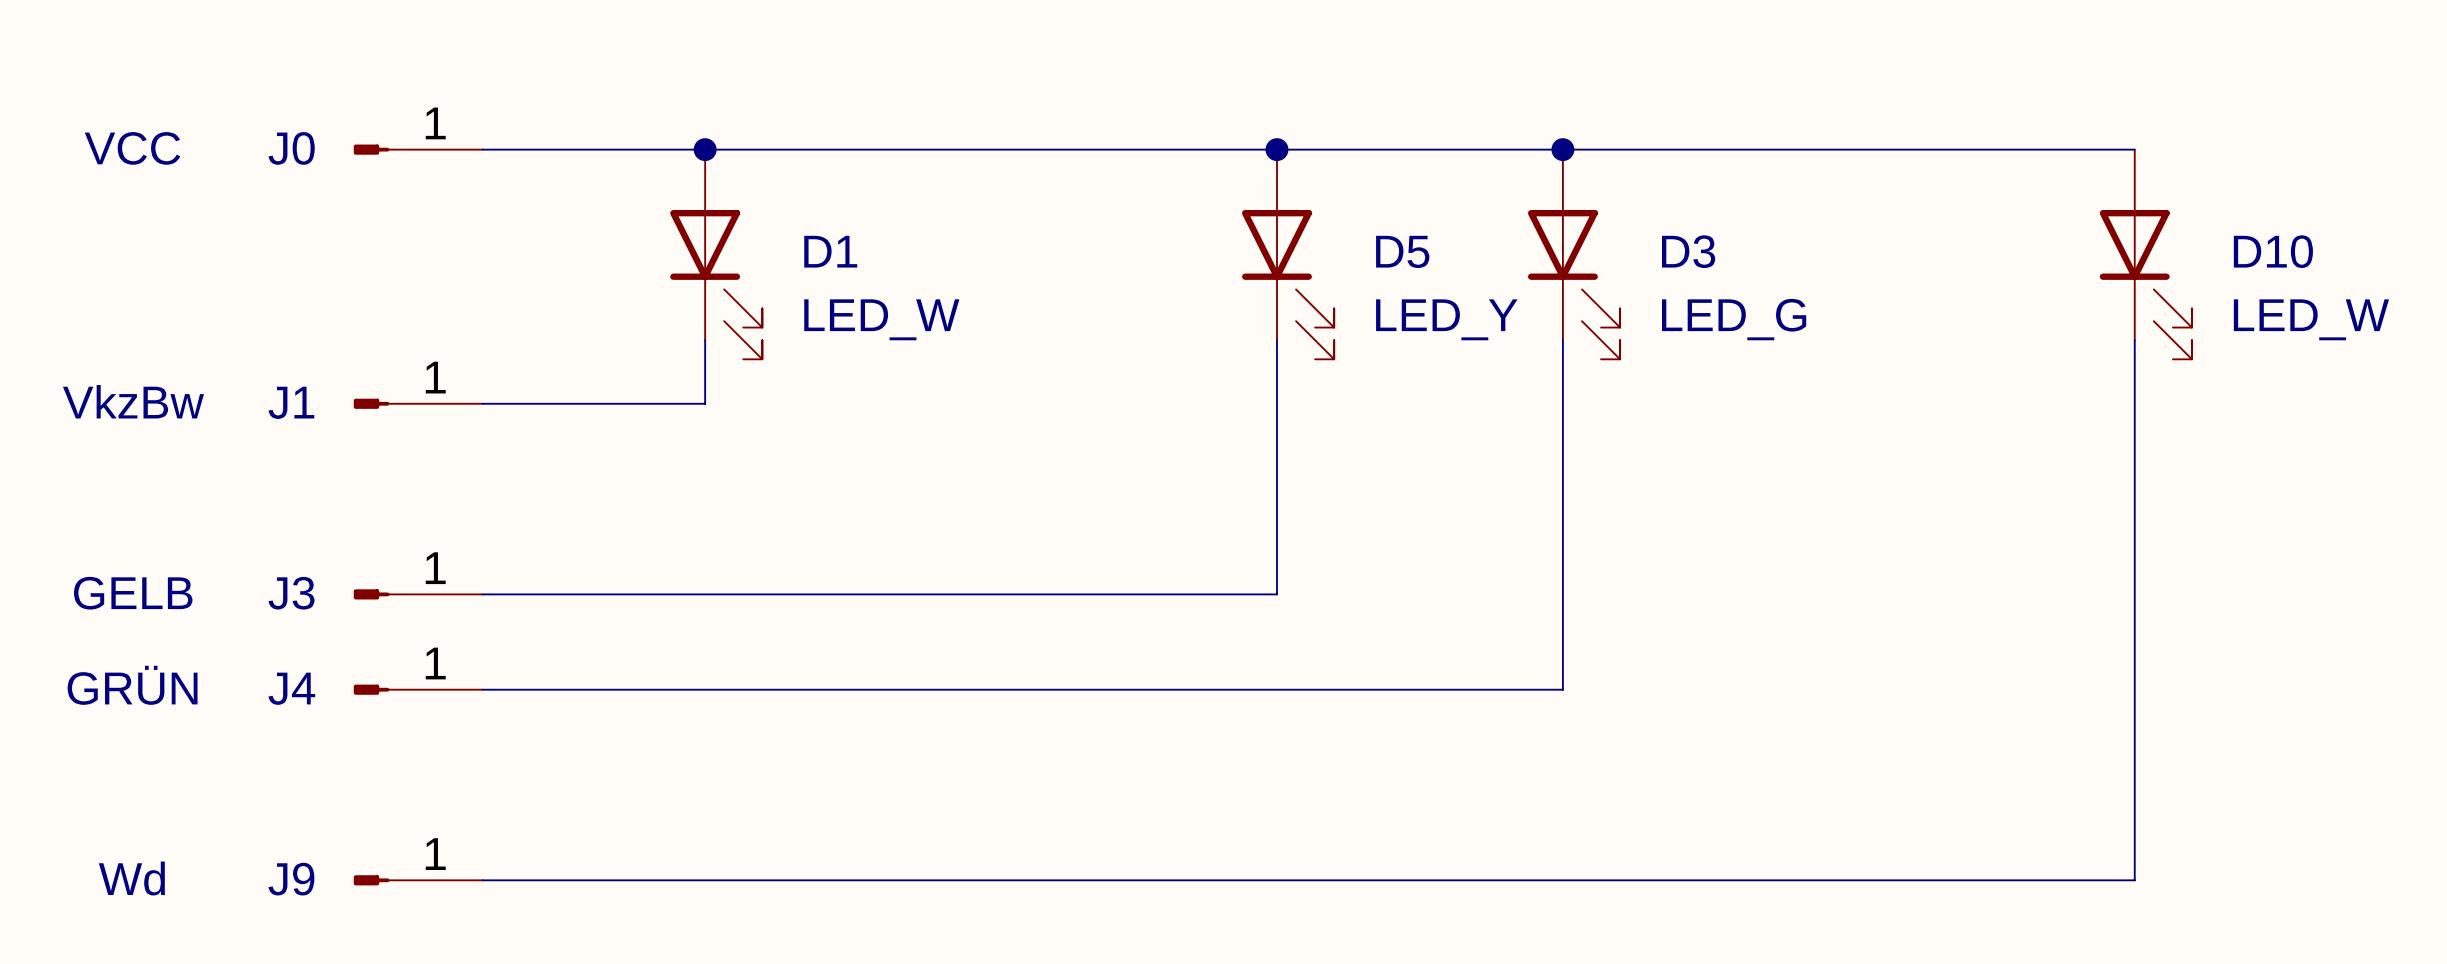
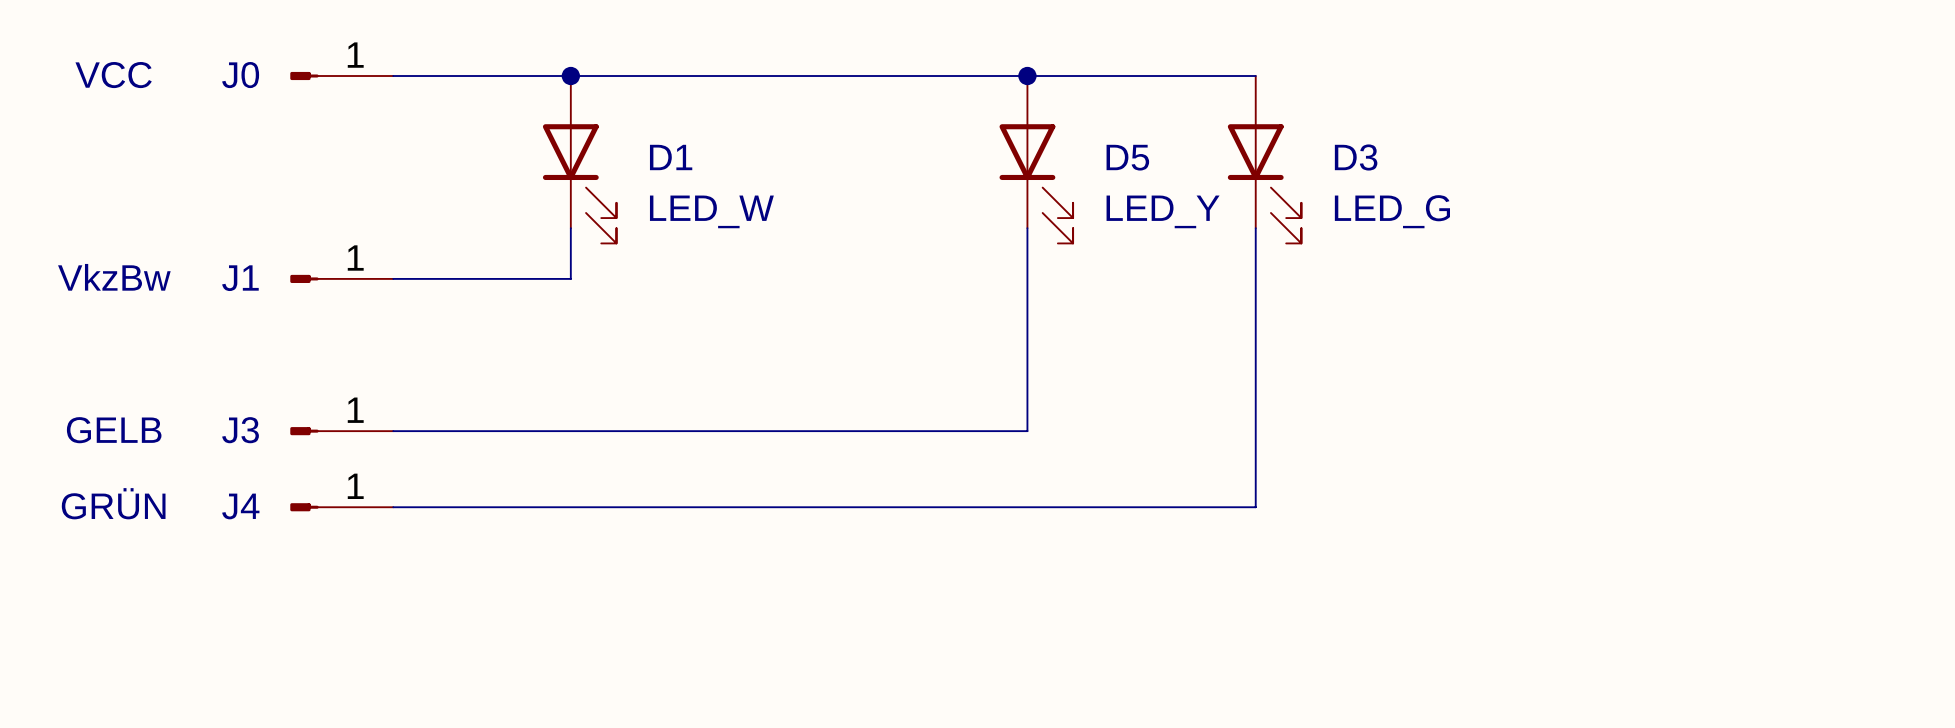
wire: (1562, 149) (2134, 149) -> none
junction: (1562, 149) -> none
D10: LED_W (2145, 254) -> none
wire: (2134, 340) (2134, 880) (482, 880) -> none
J9: Wd (418, 880) -> none

